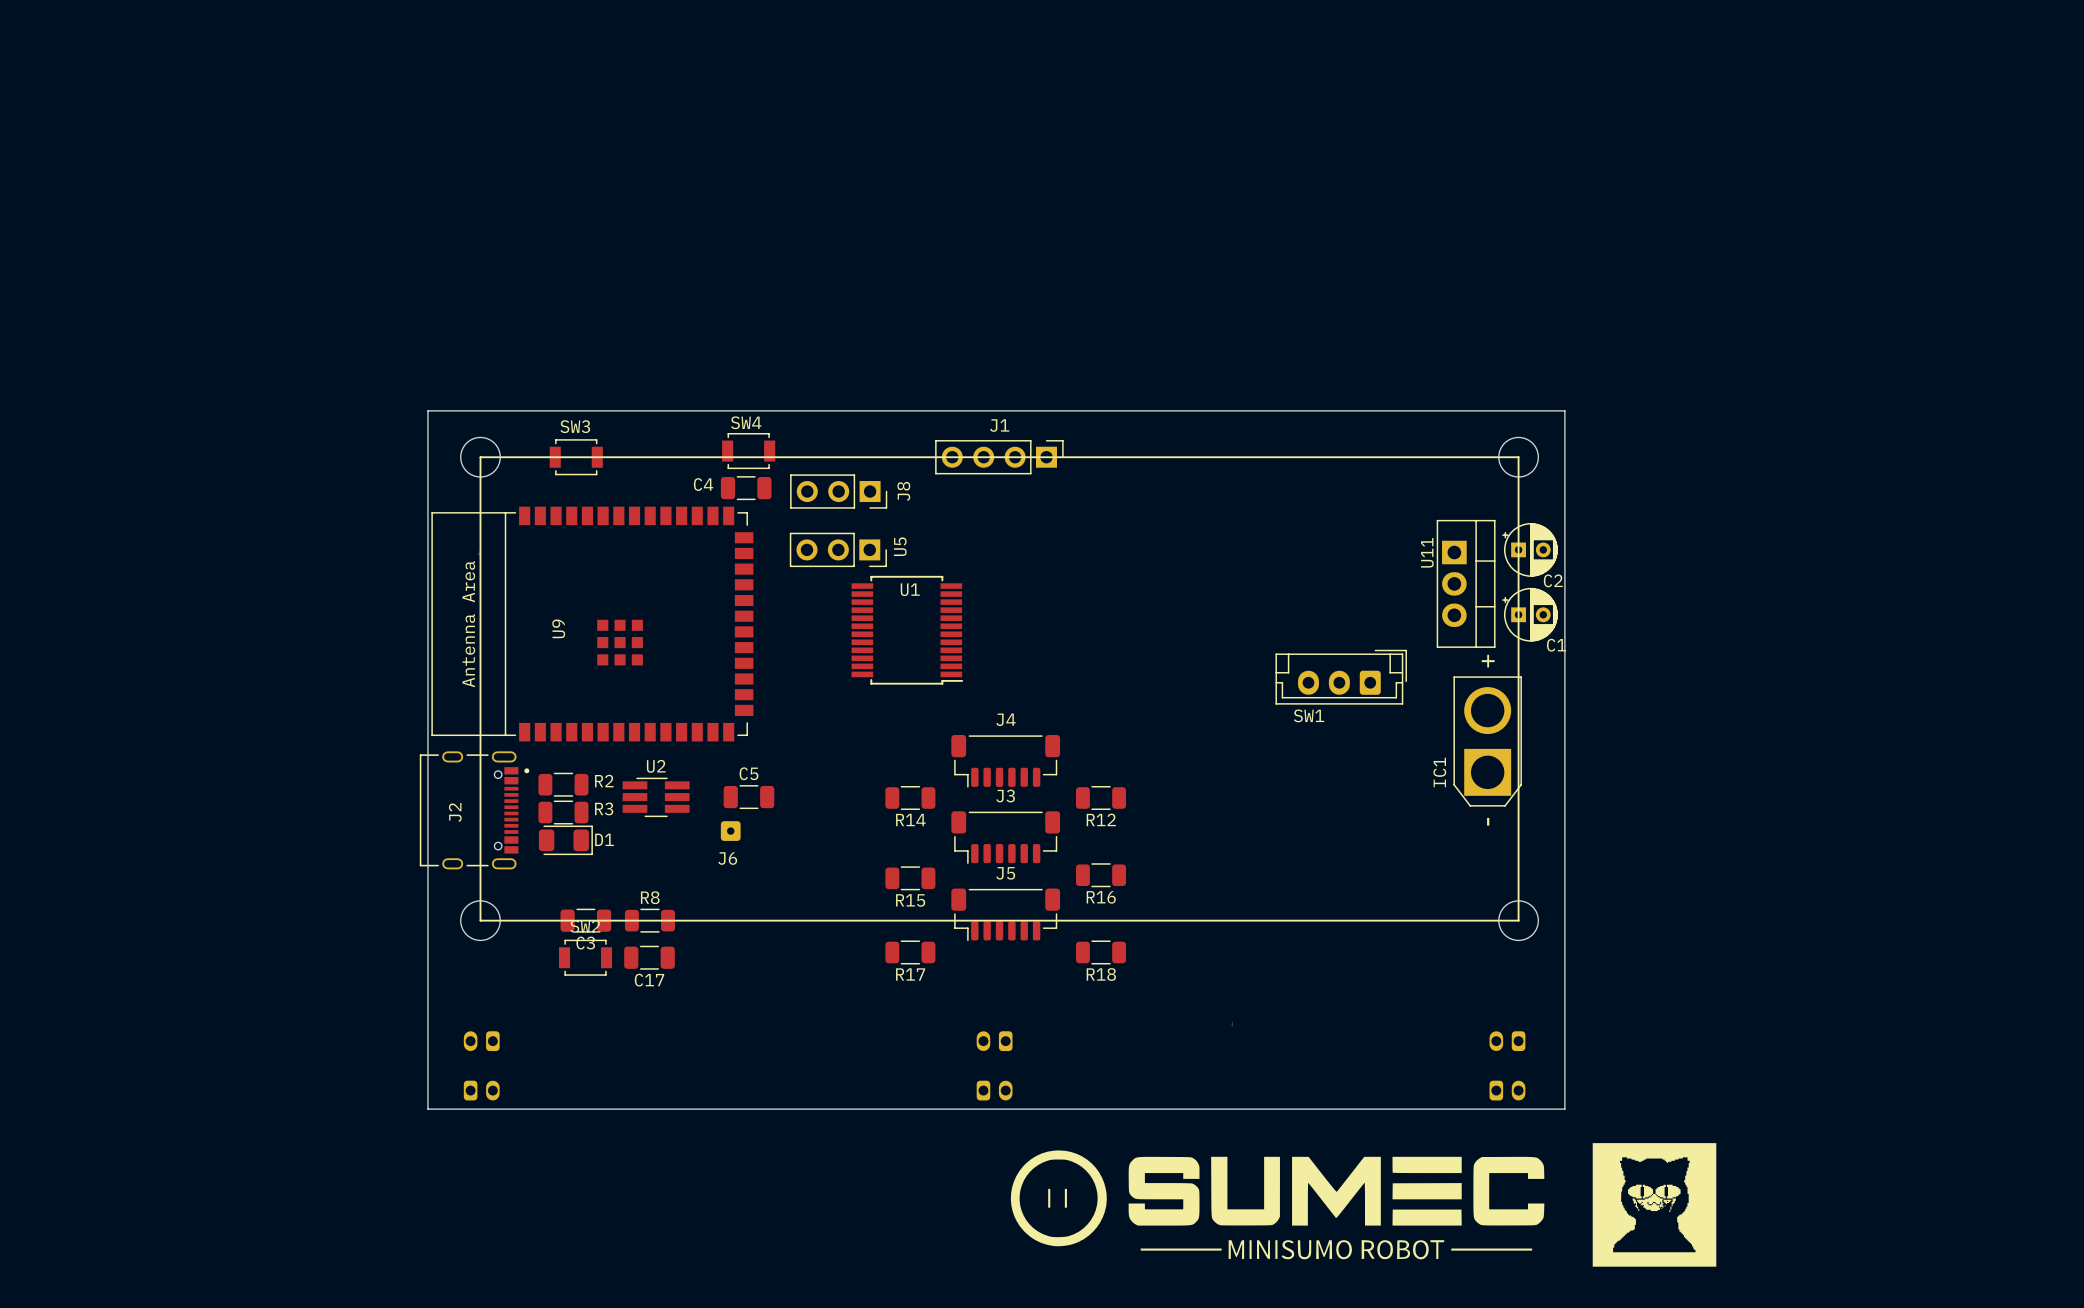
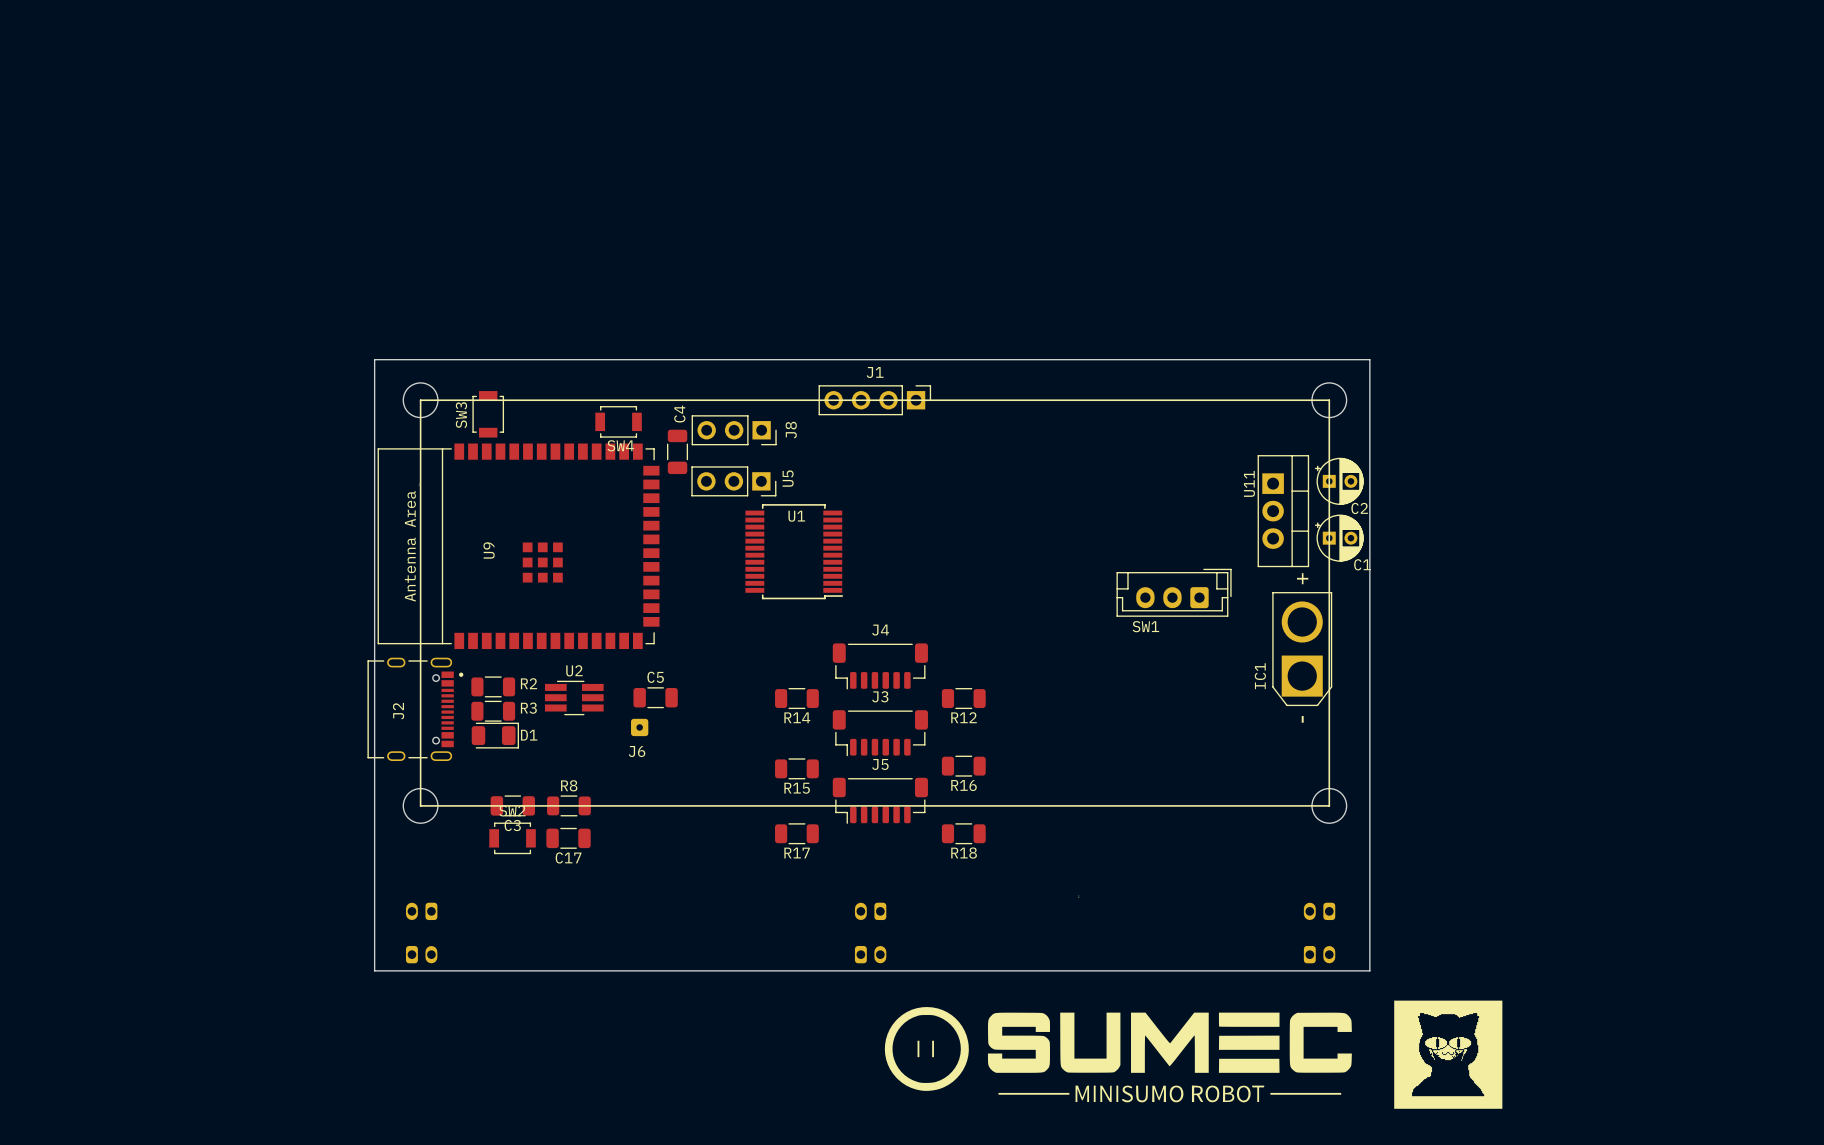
SW4 name position: SW4 (746, 422) -> SW4 (620, 445)
SW3 name position: SW3 (575, 426) -> SW3 (461, 415)
SW4 position: (748, 451) -> (618, 421)
SW3 rotation: 0° (576, 457) -> 90° clockwise (488, 414)
C4 rotation: 0° (746, 488) -> 90° clockwise (677, 451)
C4 position: (746, 488) -> (677, 451)

